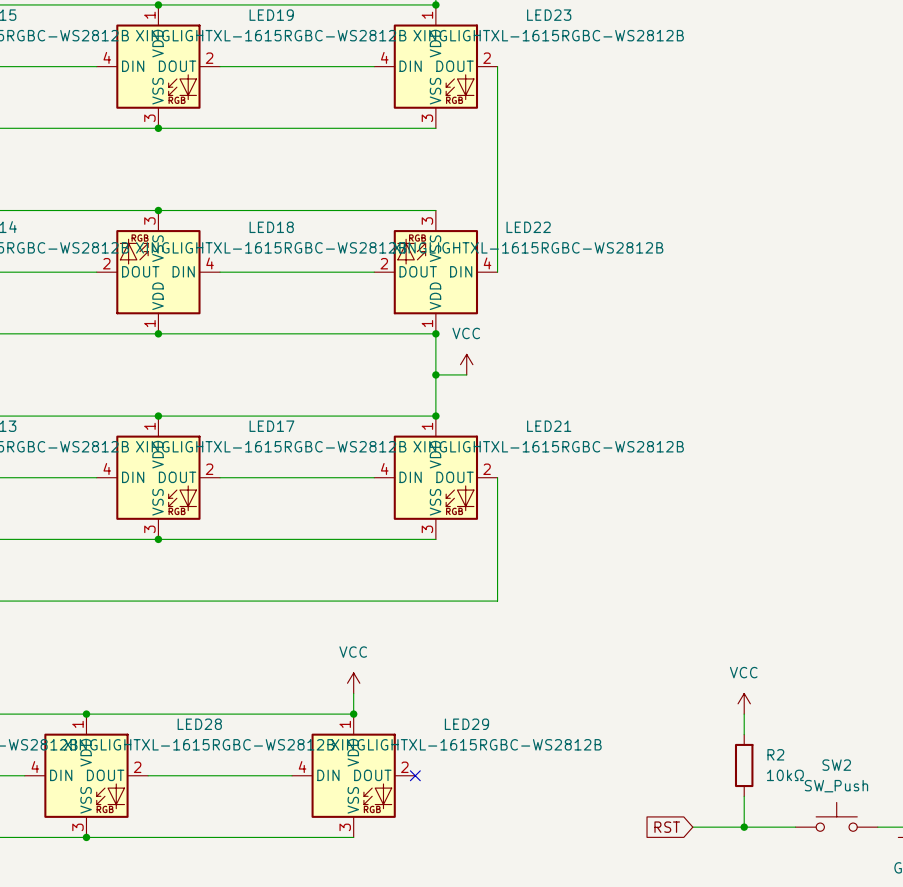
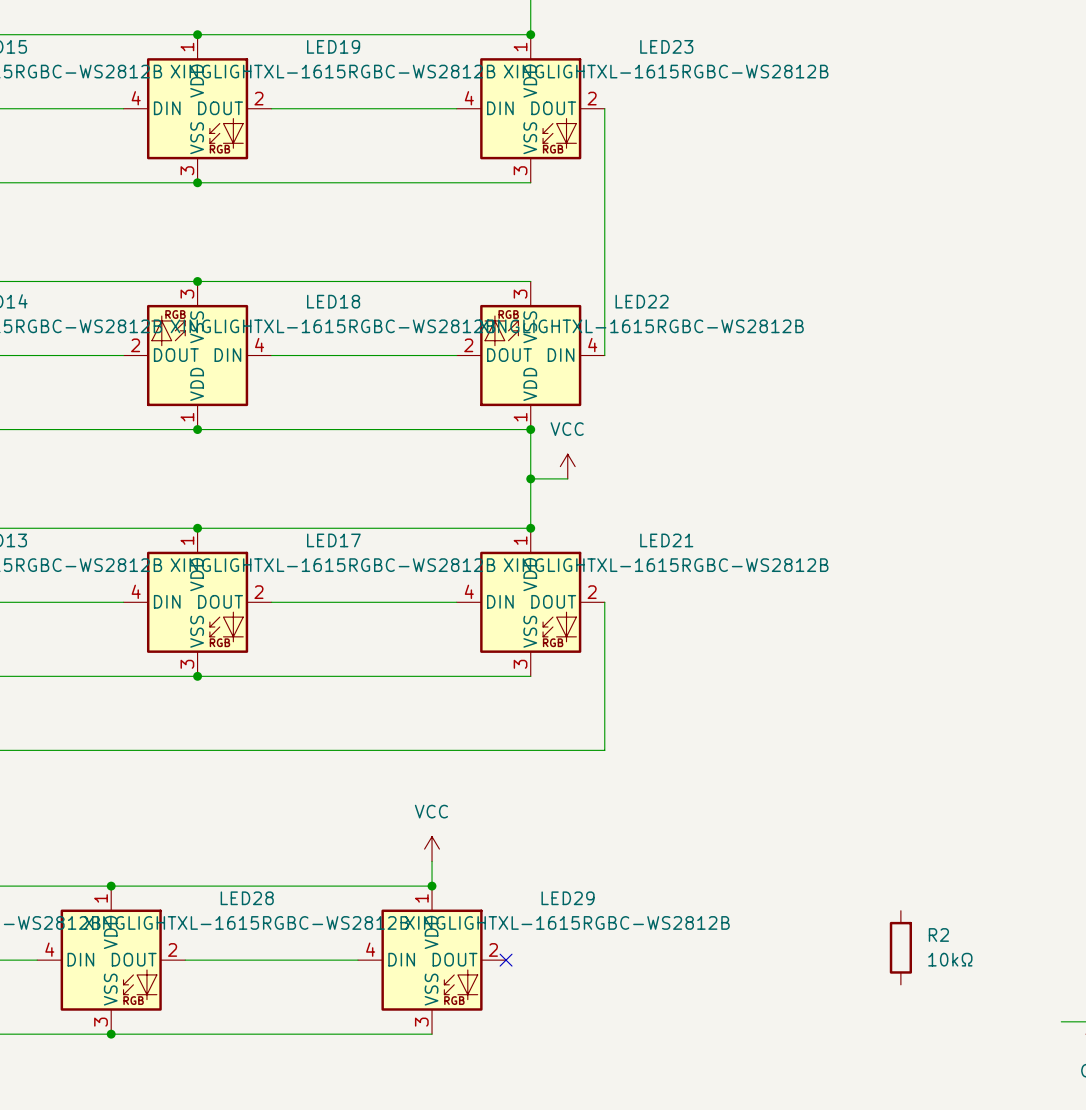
power symbol: VCC (744, 703) -> none
wire: (744, 714) (744, 734) -> none
wire: (744, 796) (744, 827) -> none
SW2: SW_Push (836, 816) -> none
global label: RST (667, 827) -> none
wire: (692, 827) (795, 827) -> none
junction: (744, 827) -> none

